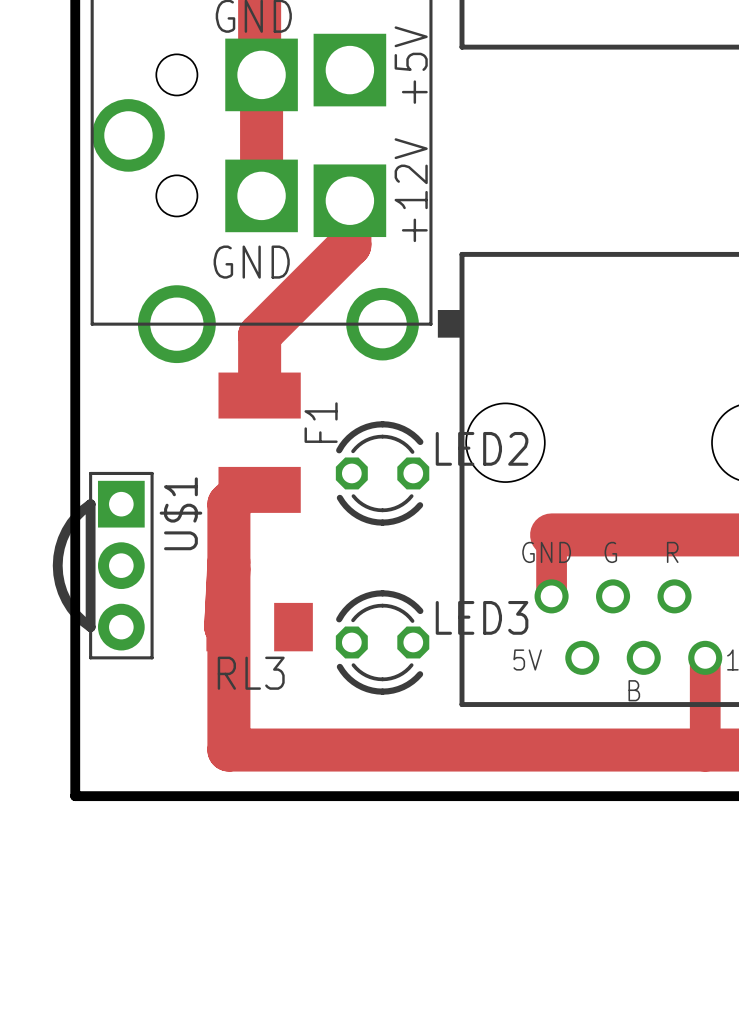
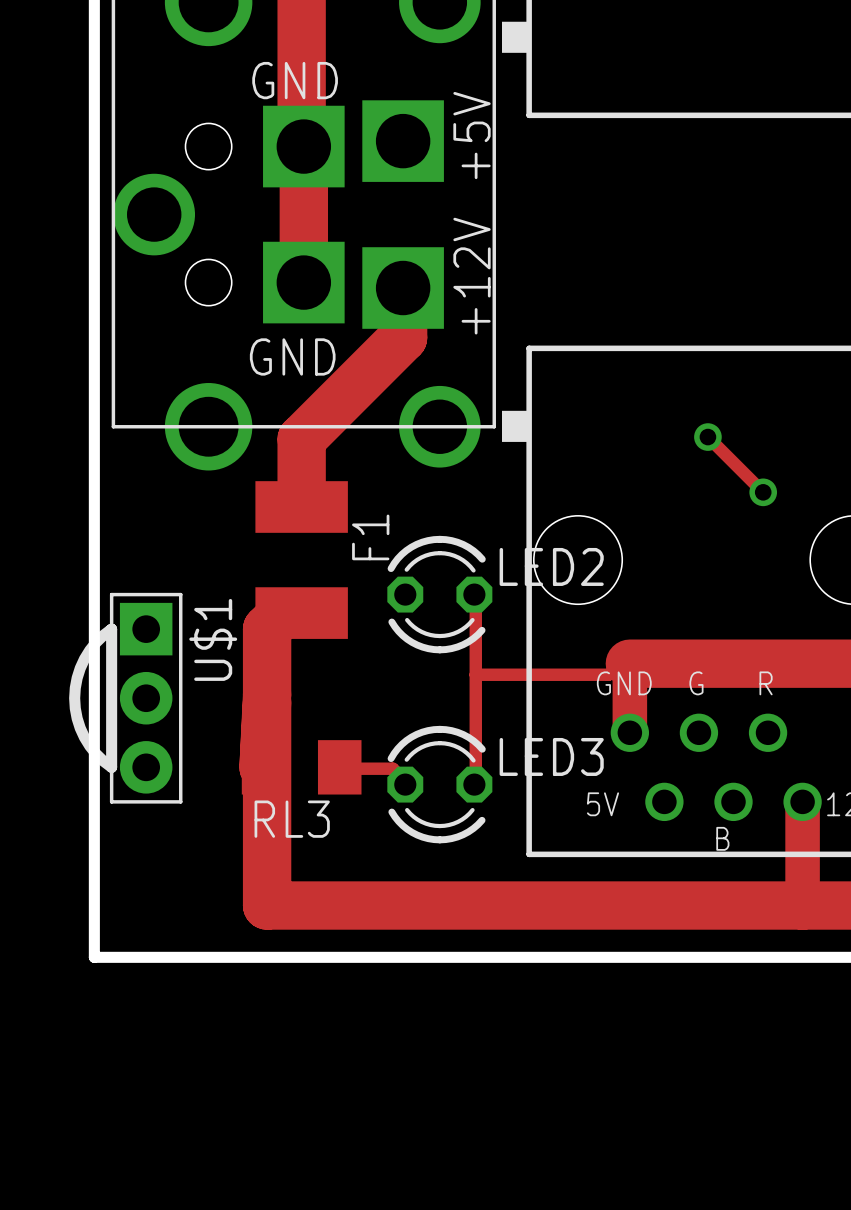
track: none -> (707, 437) (763, 492)
via: none -> (707, 437)
via: none -> (763, 492)
track: none -> (474, 594) (474, 784)
track: none -> (629, 663) (608, 674) (475, 674)
track: none -> (339, 767) (392, 768) (403, 779) (405, 784)

